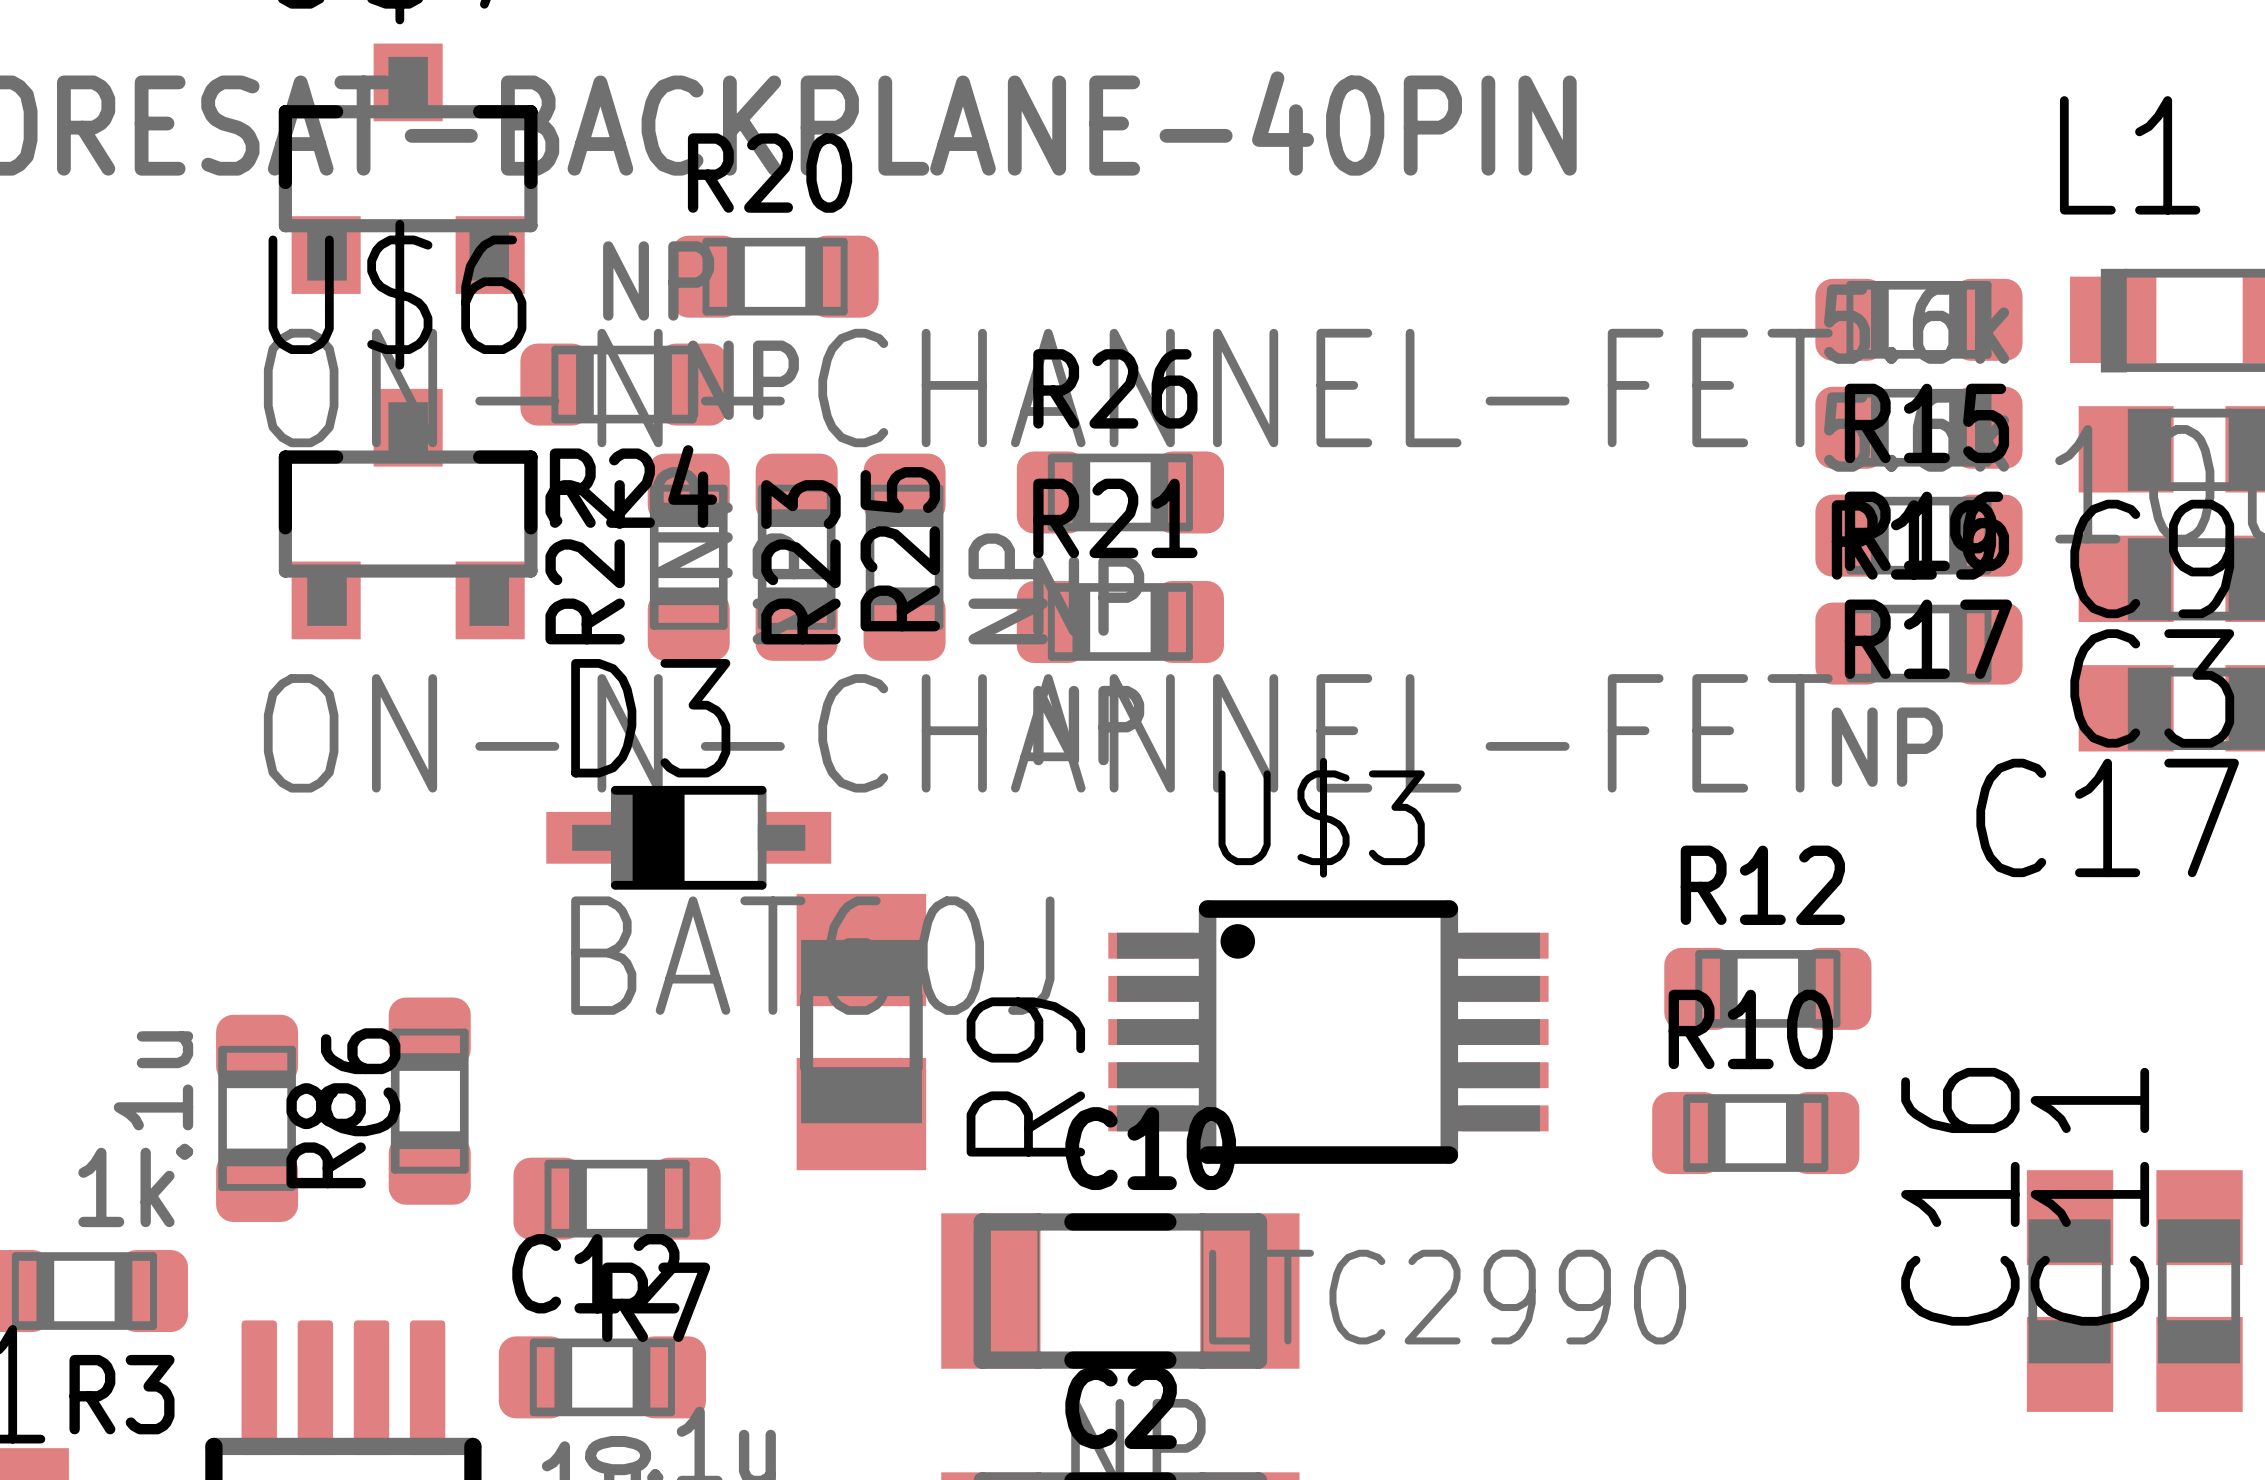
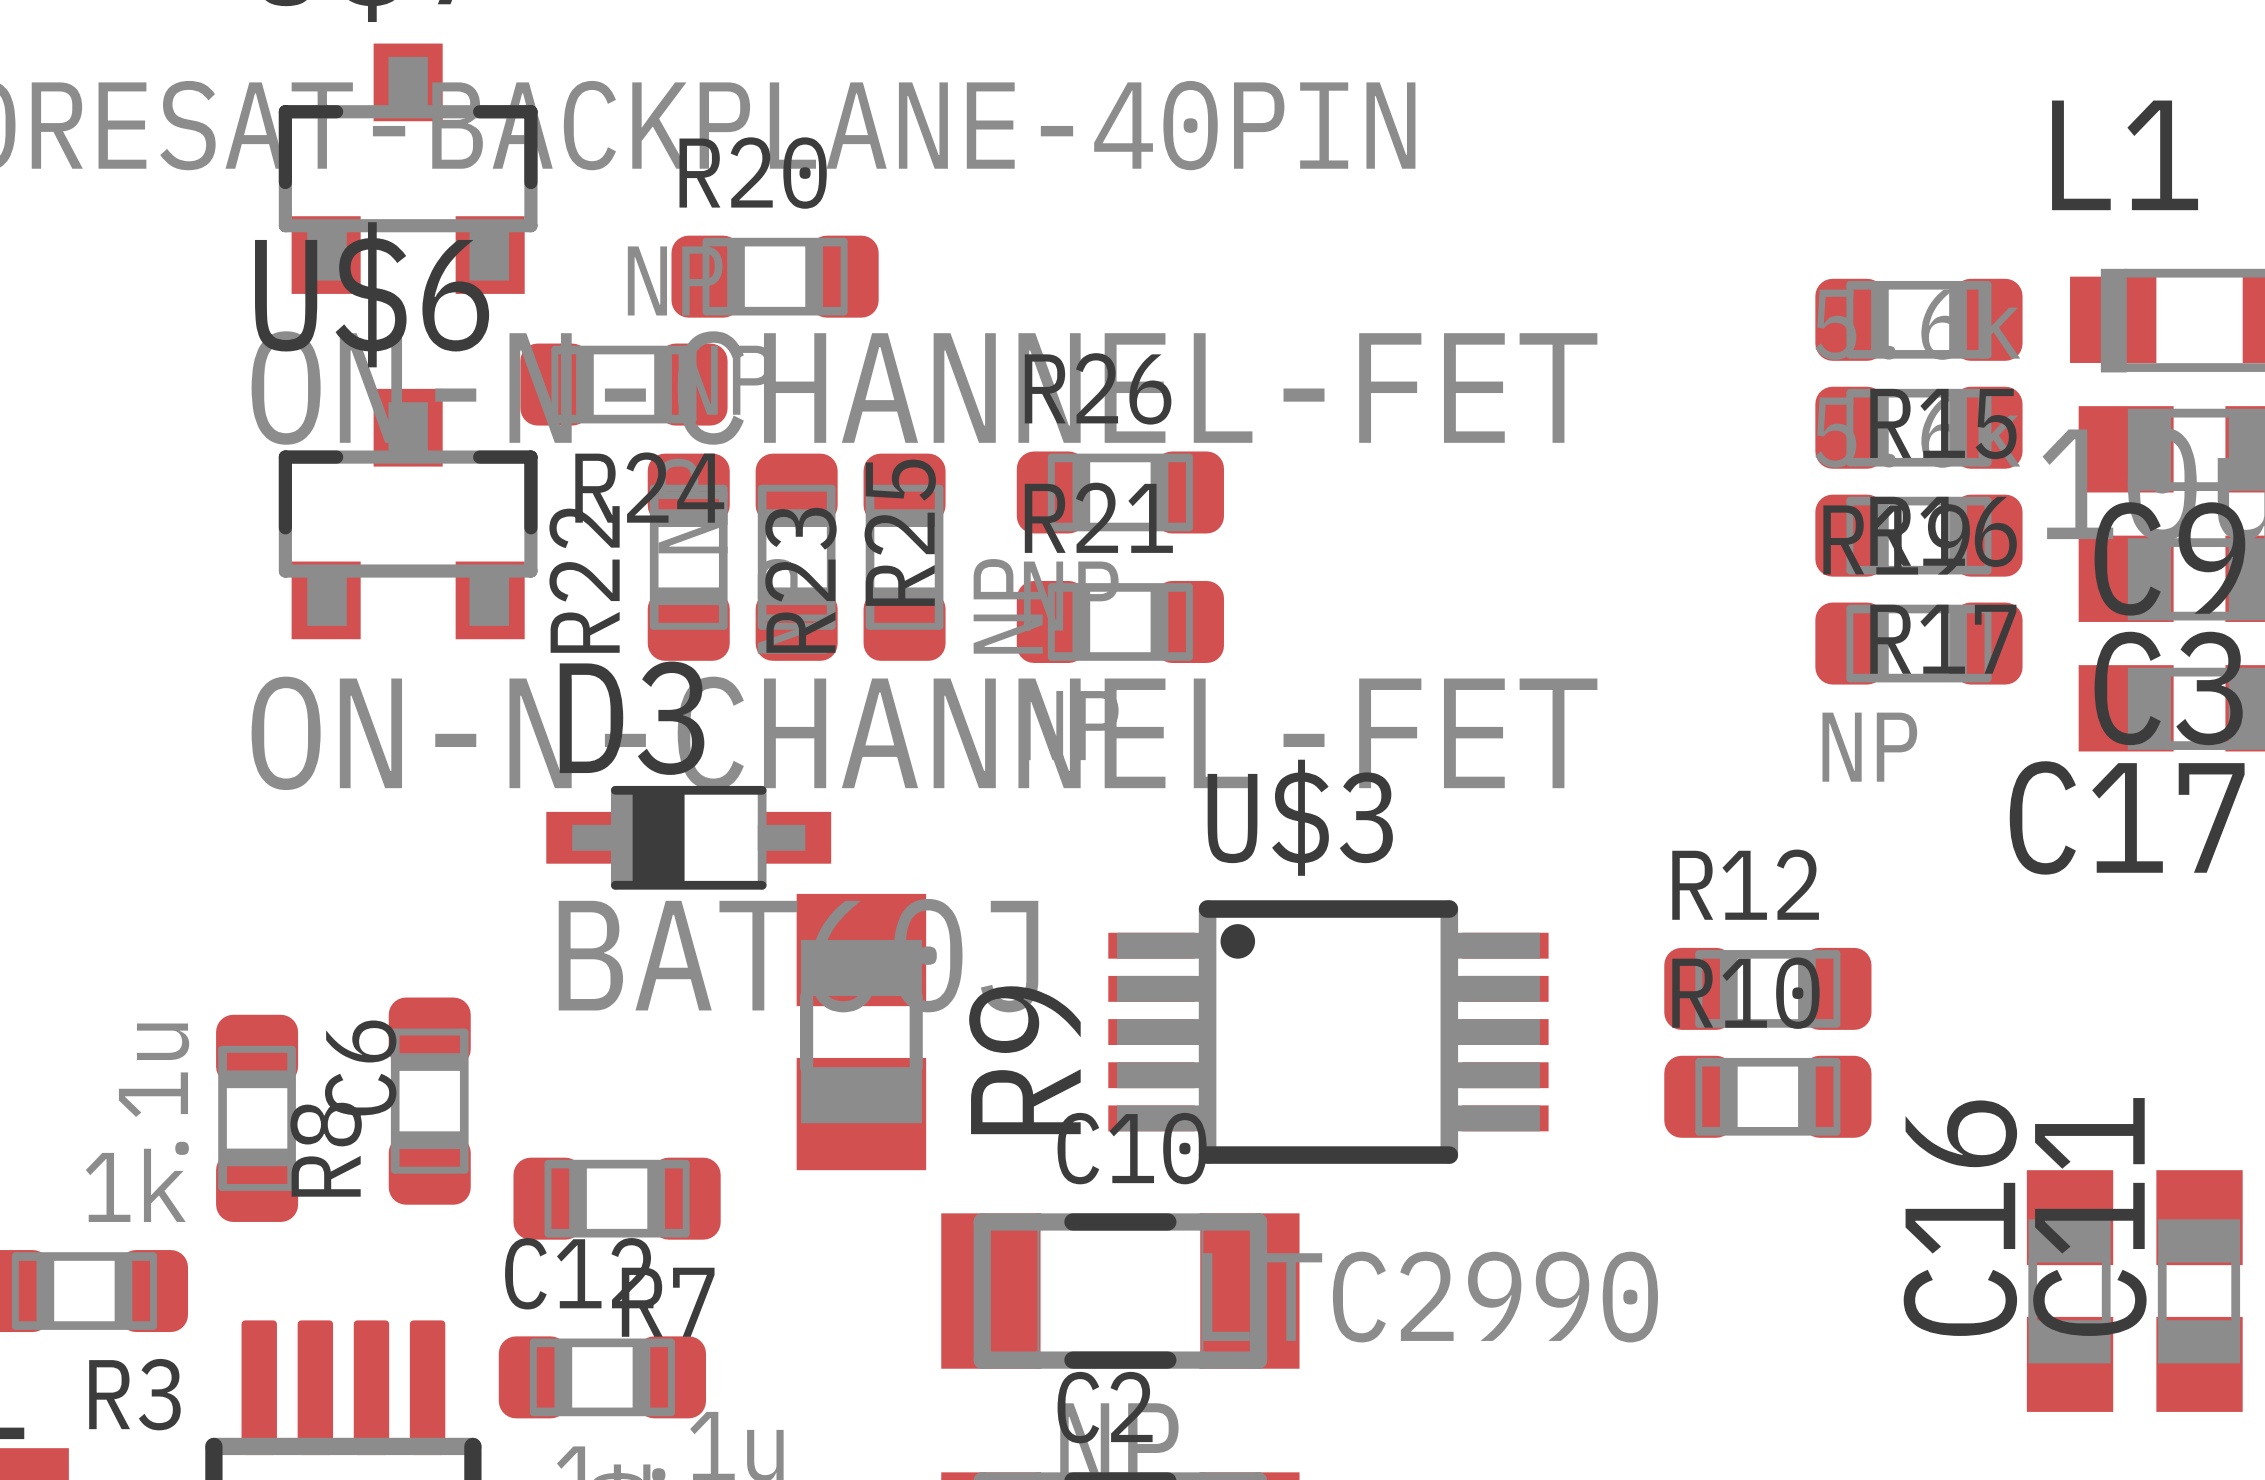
R10 position: (1755, 1133) -> (1767, 1096)

